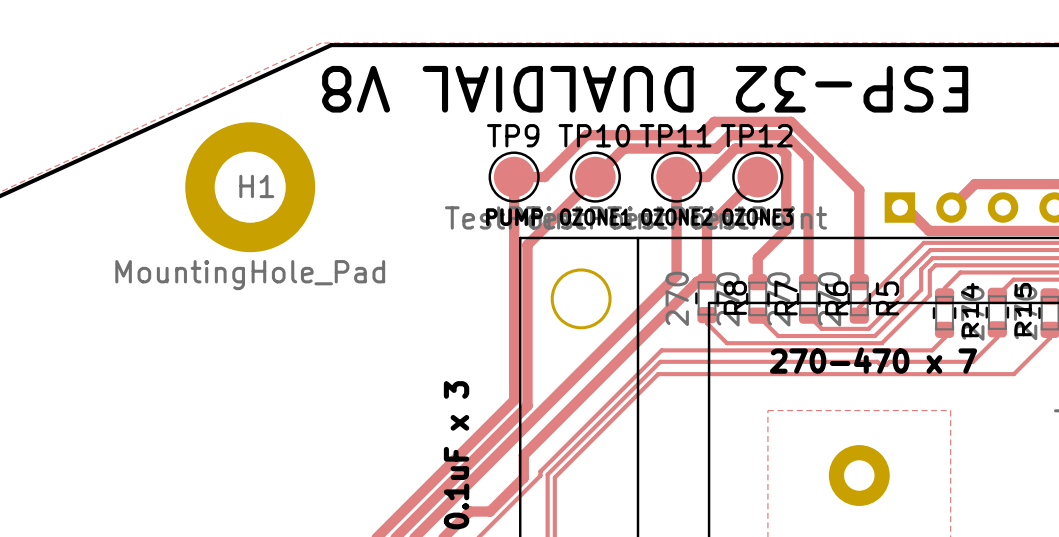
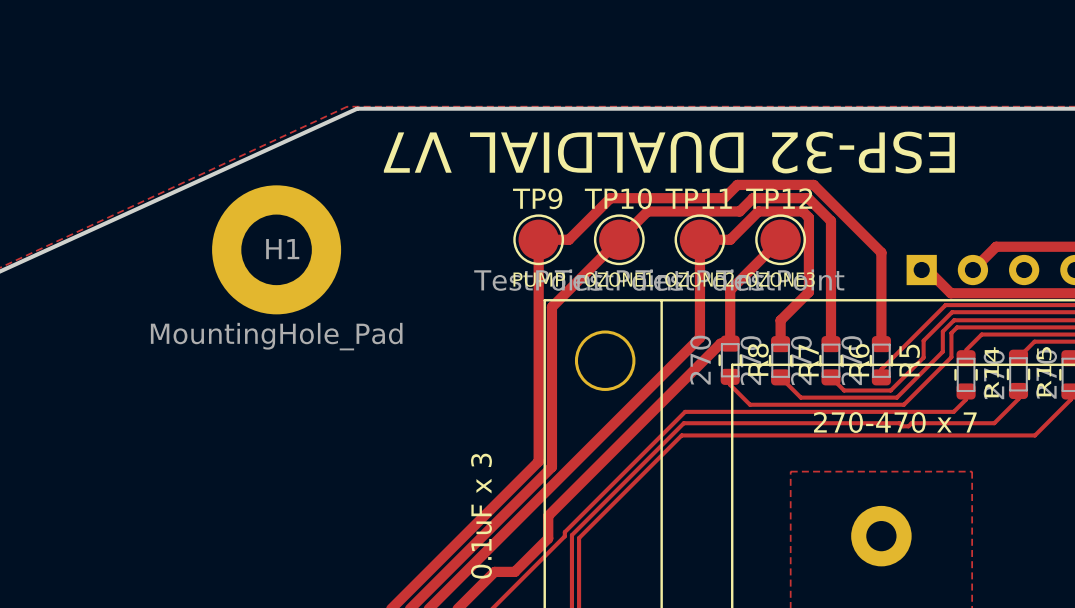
text: ESP-32 DUALDIAL V8 (645, 89) -> ESP-32 DUALDIAL V7 (669, 152)

